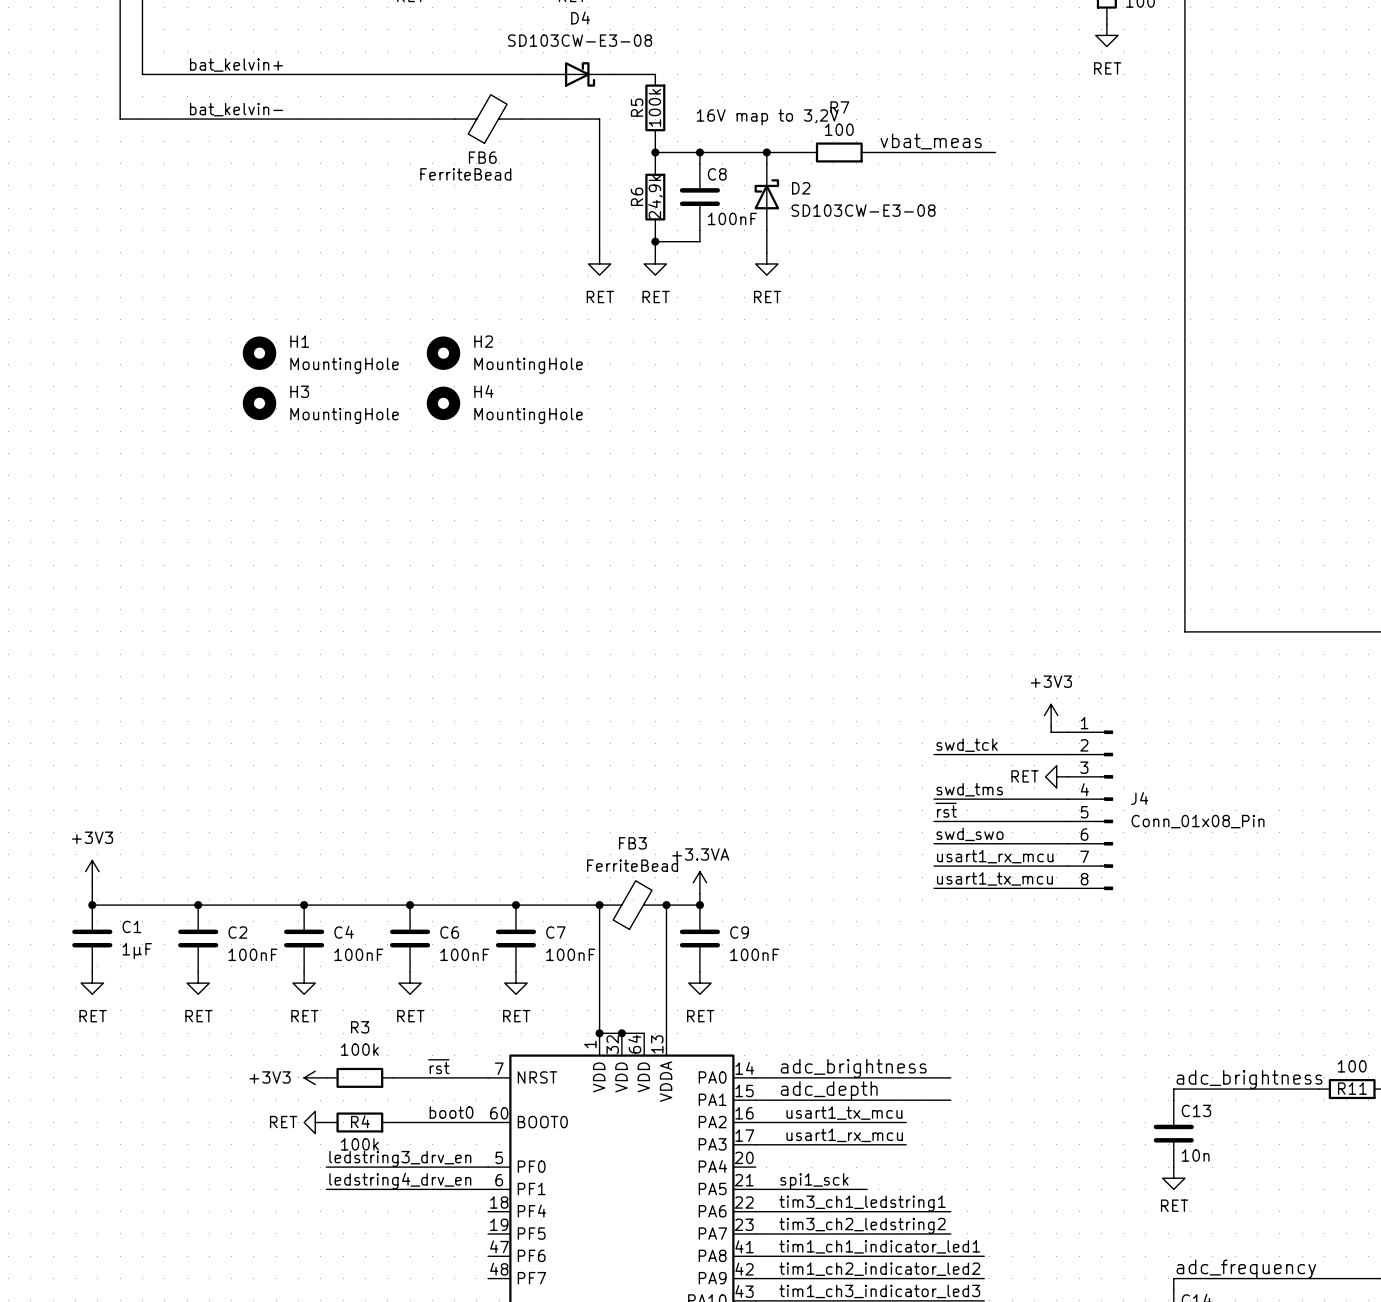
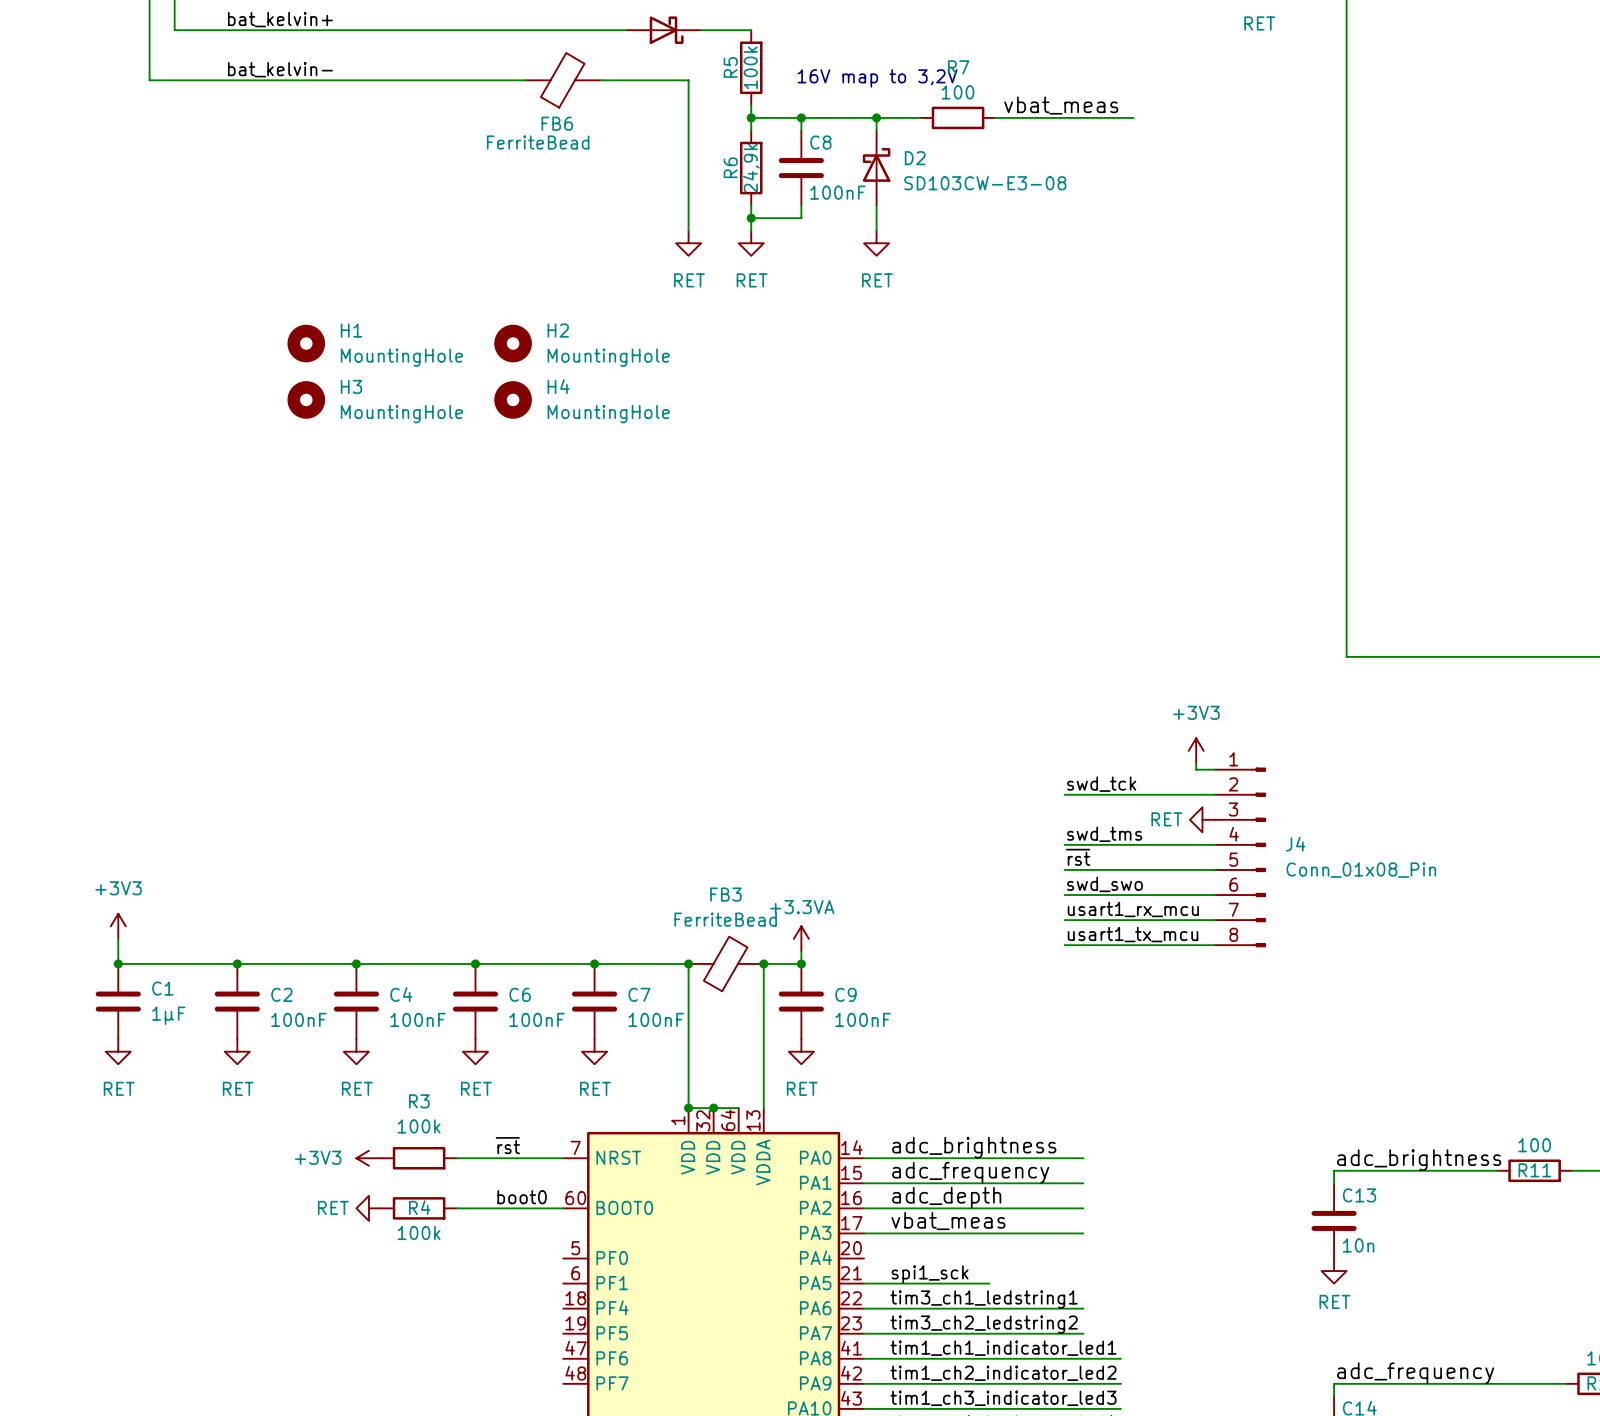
label: adc_depth (829, 1090) -> adc_frequency (970, 1172)
label: usart1_tx_mcu (844, 1113) -> adc_depth (946, 1197)
wire: none -> (1033, 1208) (1083, 1208)
label: usart1_rx_mcu (844, 1135) -> vbat_meas (948, 1221)
wire: none -> (1033, 1233) (1083, 1233)
label: ledstring3_drv_en (400, 1158) -> none
wire: (326, 1167) (488, 1167) -> none
label: ledstring4_drv_en (400, 1181) -> none
wire: (326, 1189) (488, 1189) -> none

